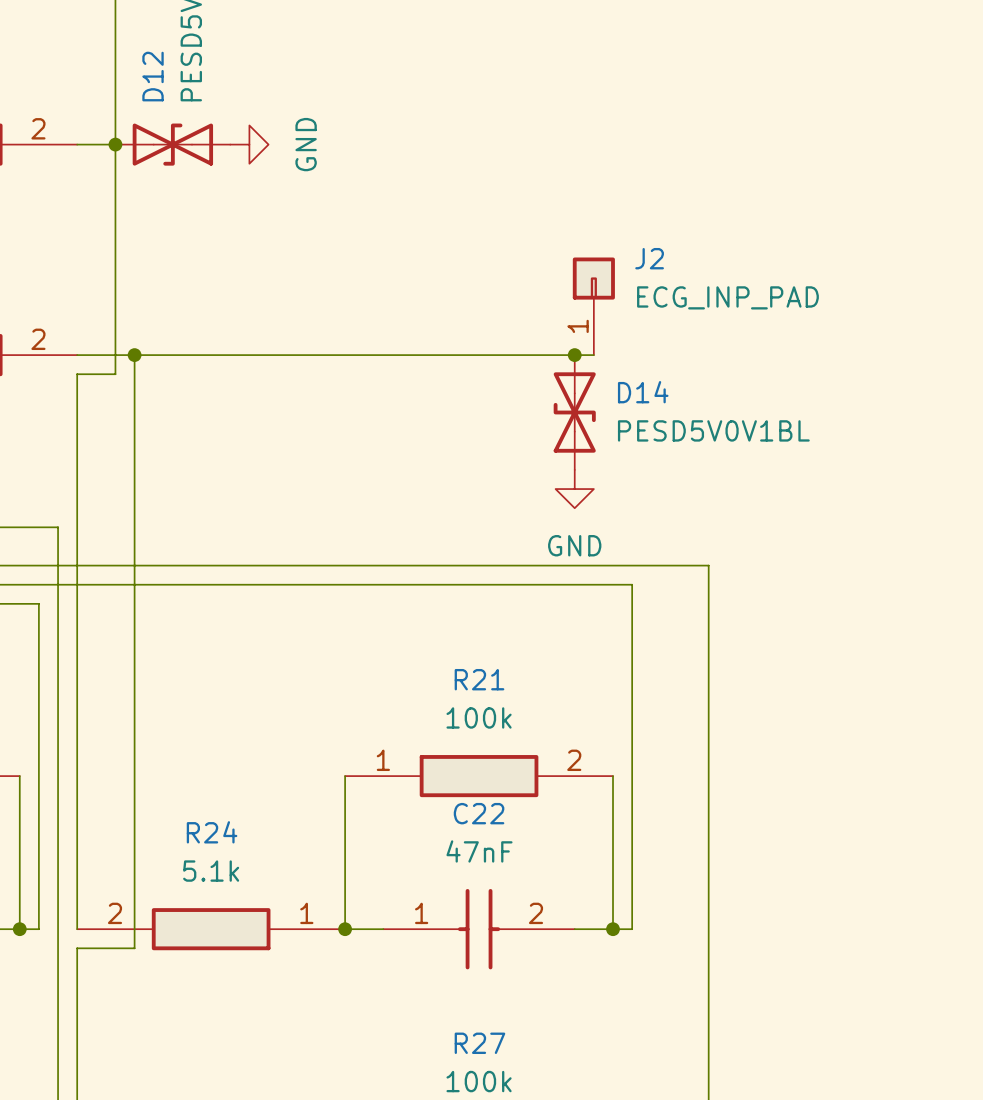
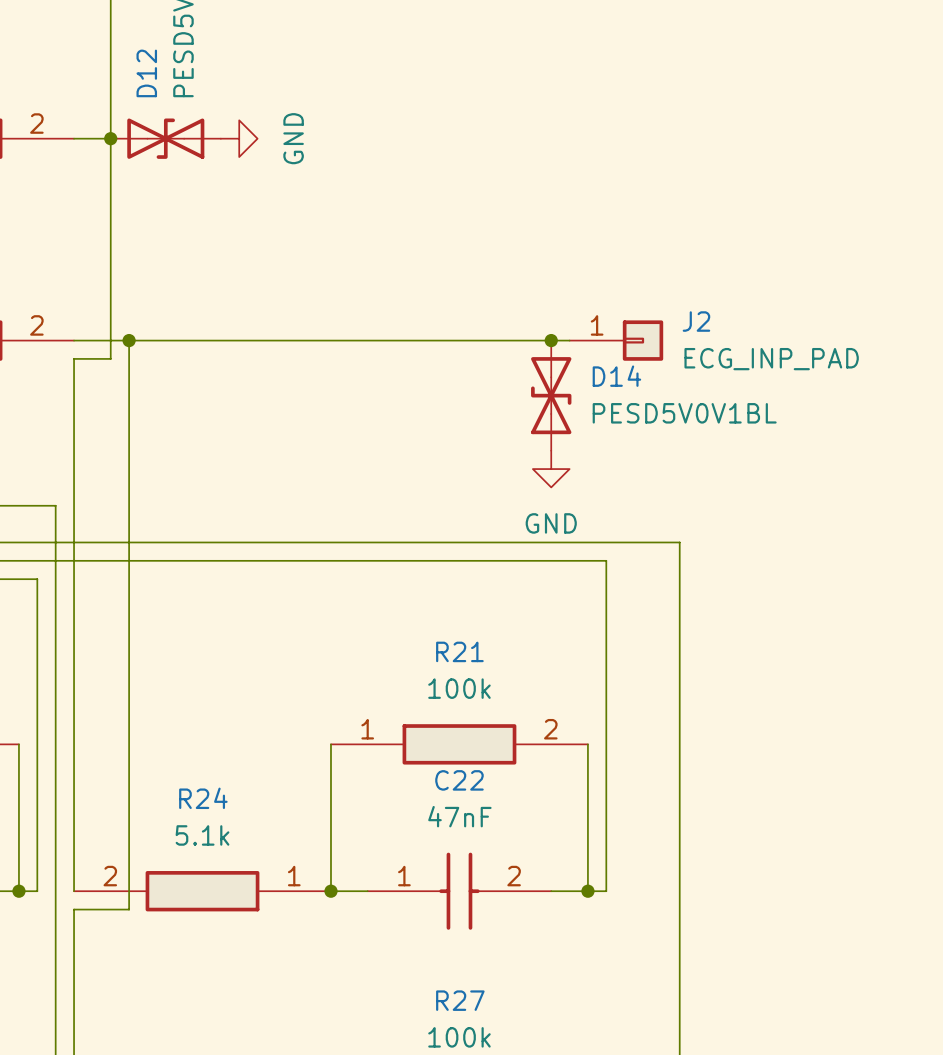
J2 name position: J2 (649, 258) -> J2 (696, 321)
J2 rotation: 0° (593, 278) -> 90° clockwise (643, 340)
J2 value position: ECG_INP_PAD (727, 297) -> ECG_INP_PAD (771, 359)
J2 position: (593, 306) -> (616, 340)

